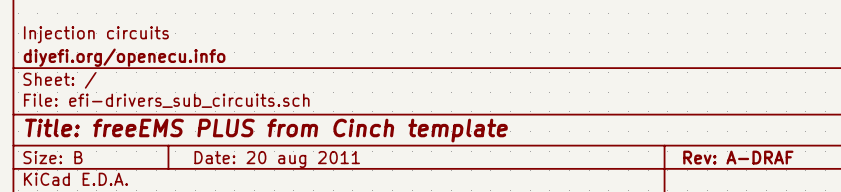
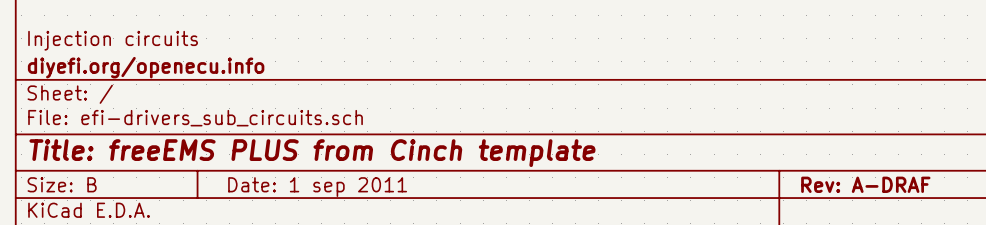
title block: Date: 20 aug 2011 (277, 159) -> Date: 1 sep 2011 (317, 187)

